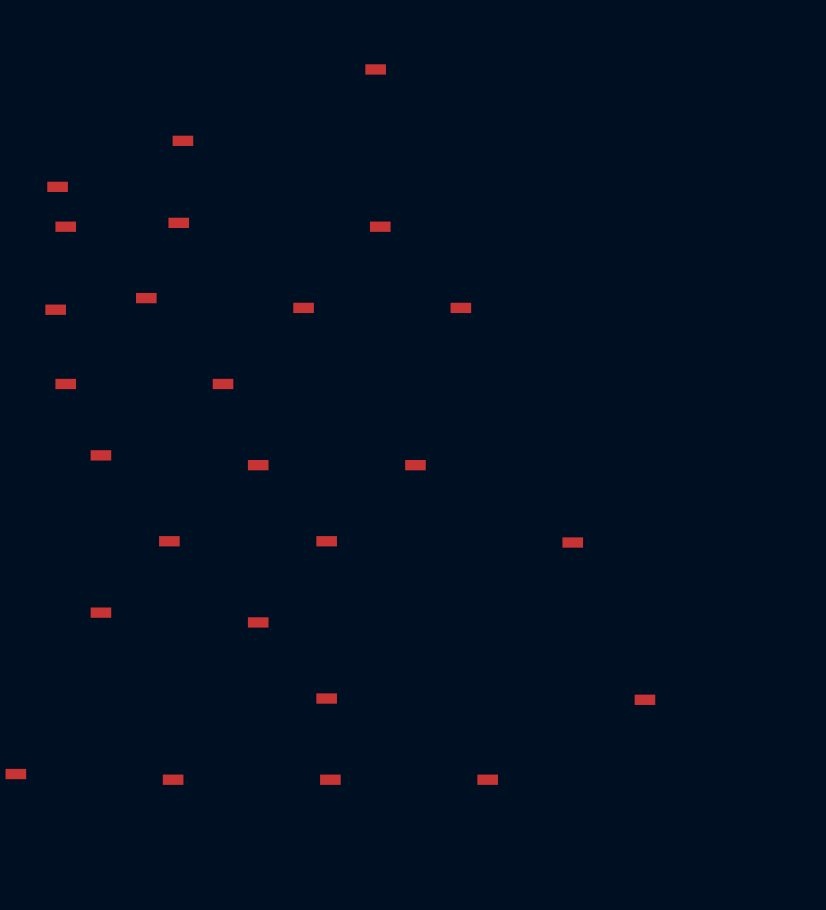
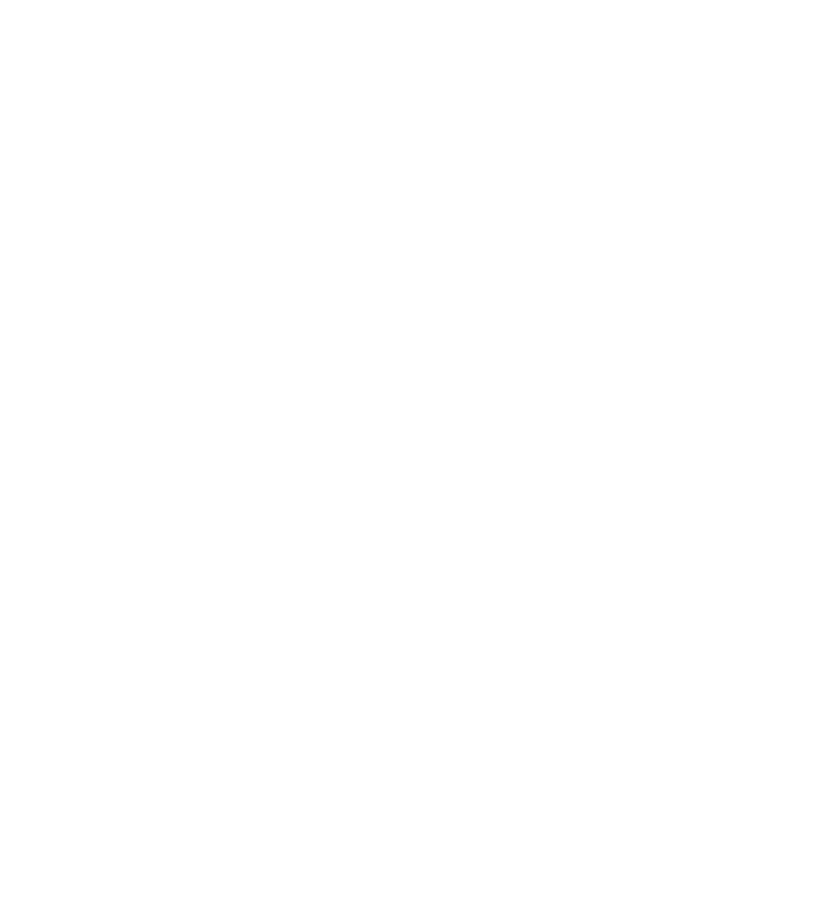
part: (375, 69) -> none
part: (182, 140) -> none
part: (57, 186) -> none
part: (178, 222) -> none
part: (65, 226) -> none
part: (380, 226) -> none
part: (146, 298) -> none
part: (303, 307) -> none
part: (460, 307) -> none
part: (55, 309) -> none
part: (65, 383) -> none
part: (223, 383) -> none
part: (100, 455) -> none
part: (258, 465) -> none
part: (415, 465) -> none
part: (169, 541) -> none
part: (326, 541) -> none
part: (572, 542) -> none
part: (100, 612) -> none
part: (258, 622) -> none
part: (326, 698) -> none
part: (644, 699) -> none
part: (15, 774) -> none
part: (173, 779) -> none
part: (330, 779) -> none
part: (487, 779) -> none

